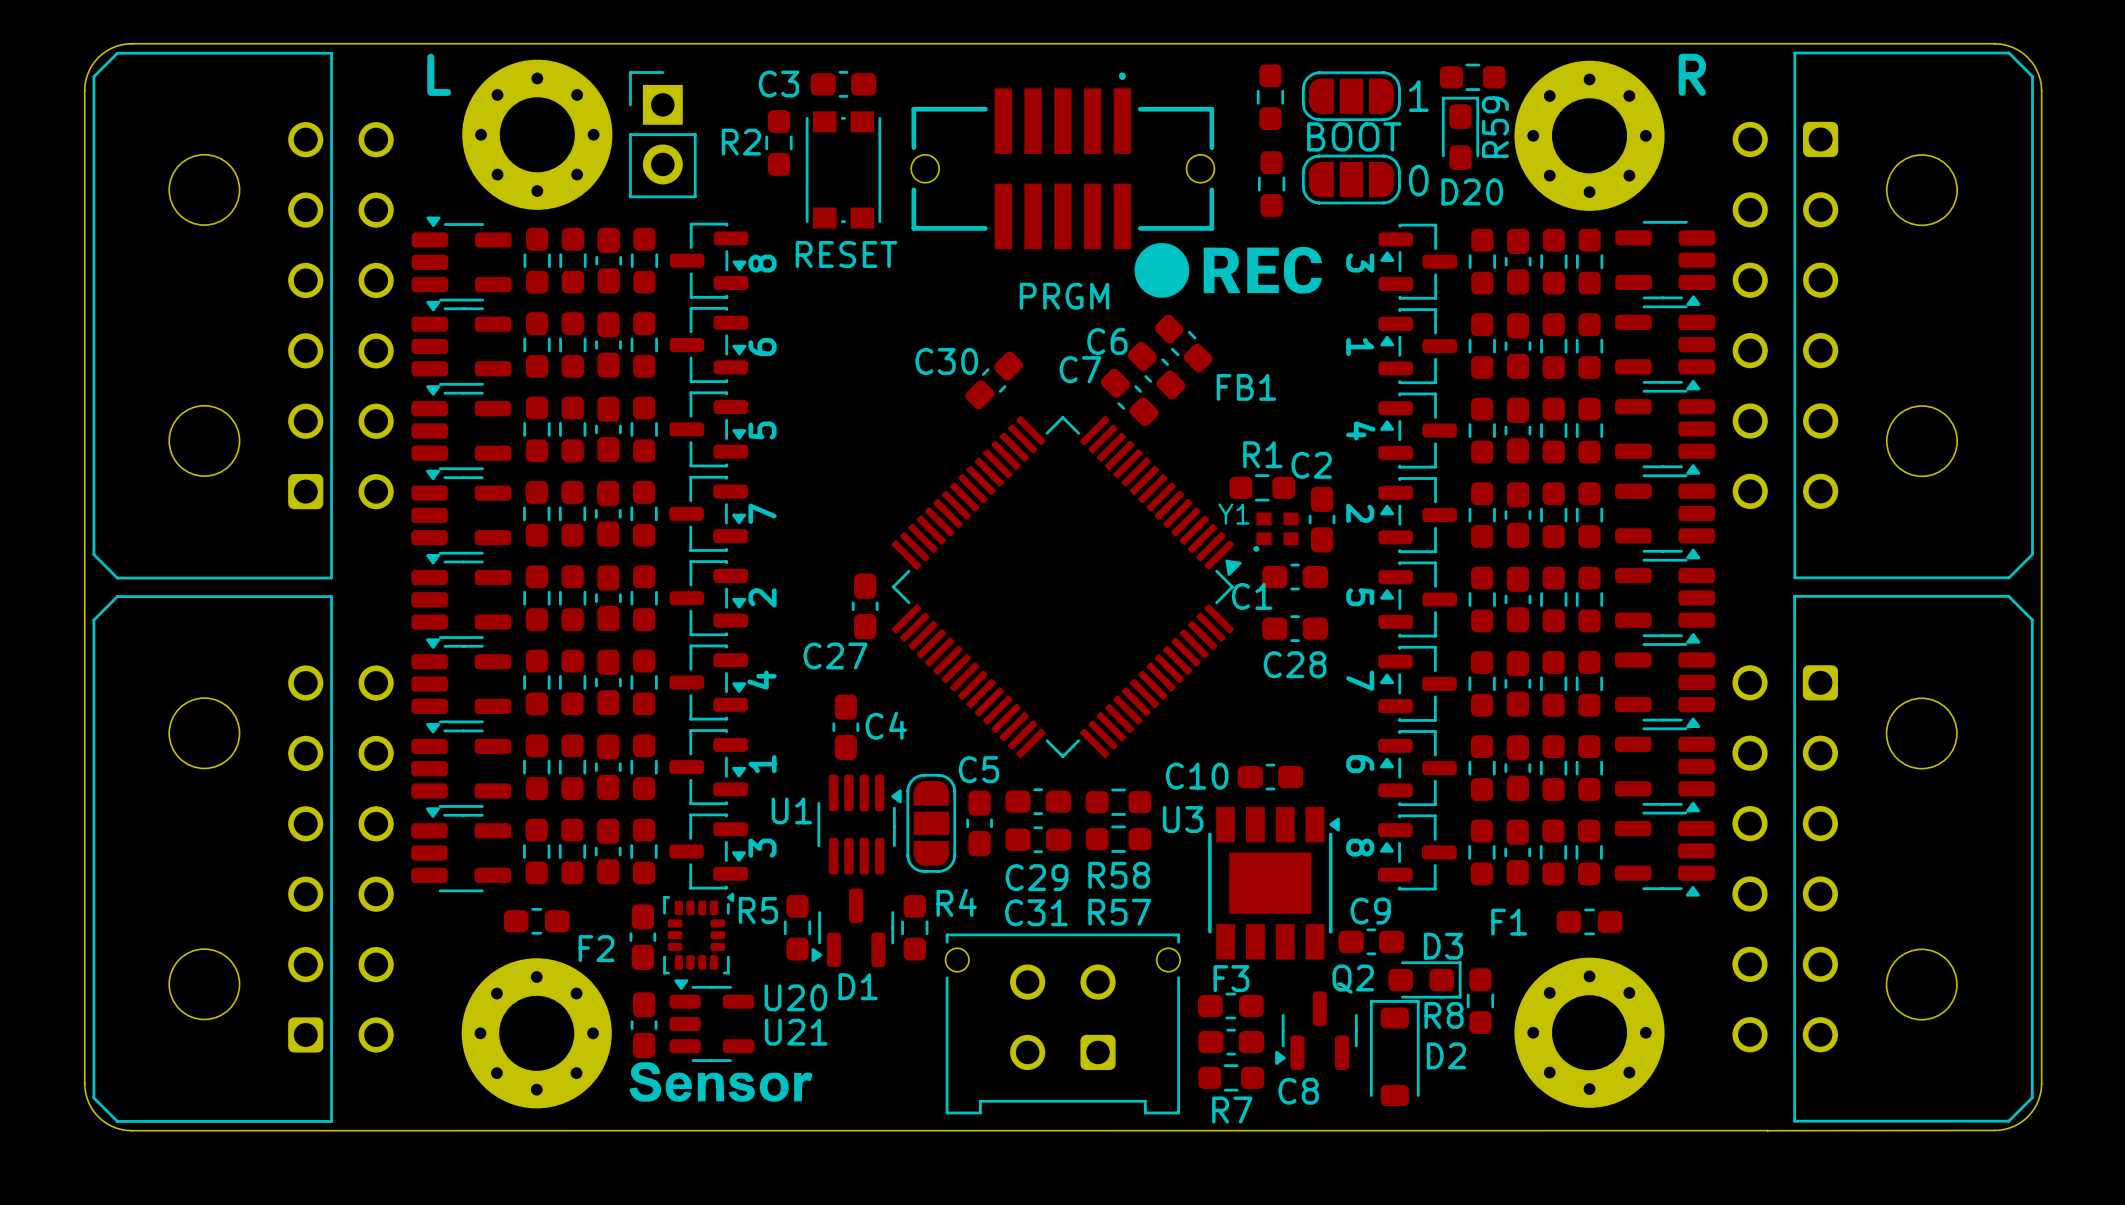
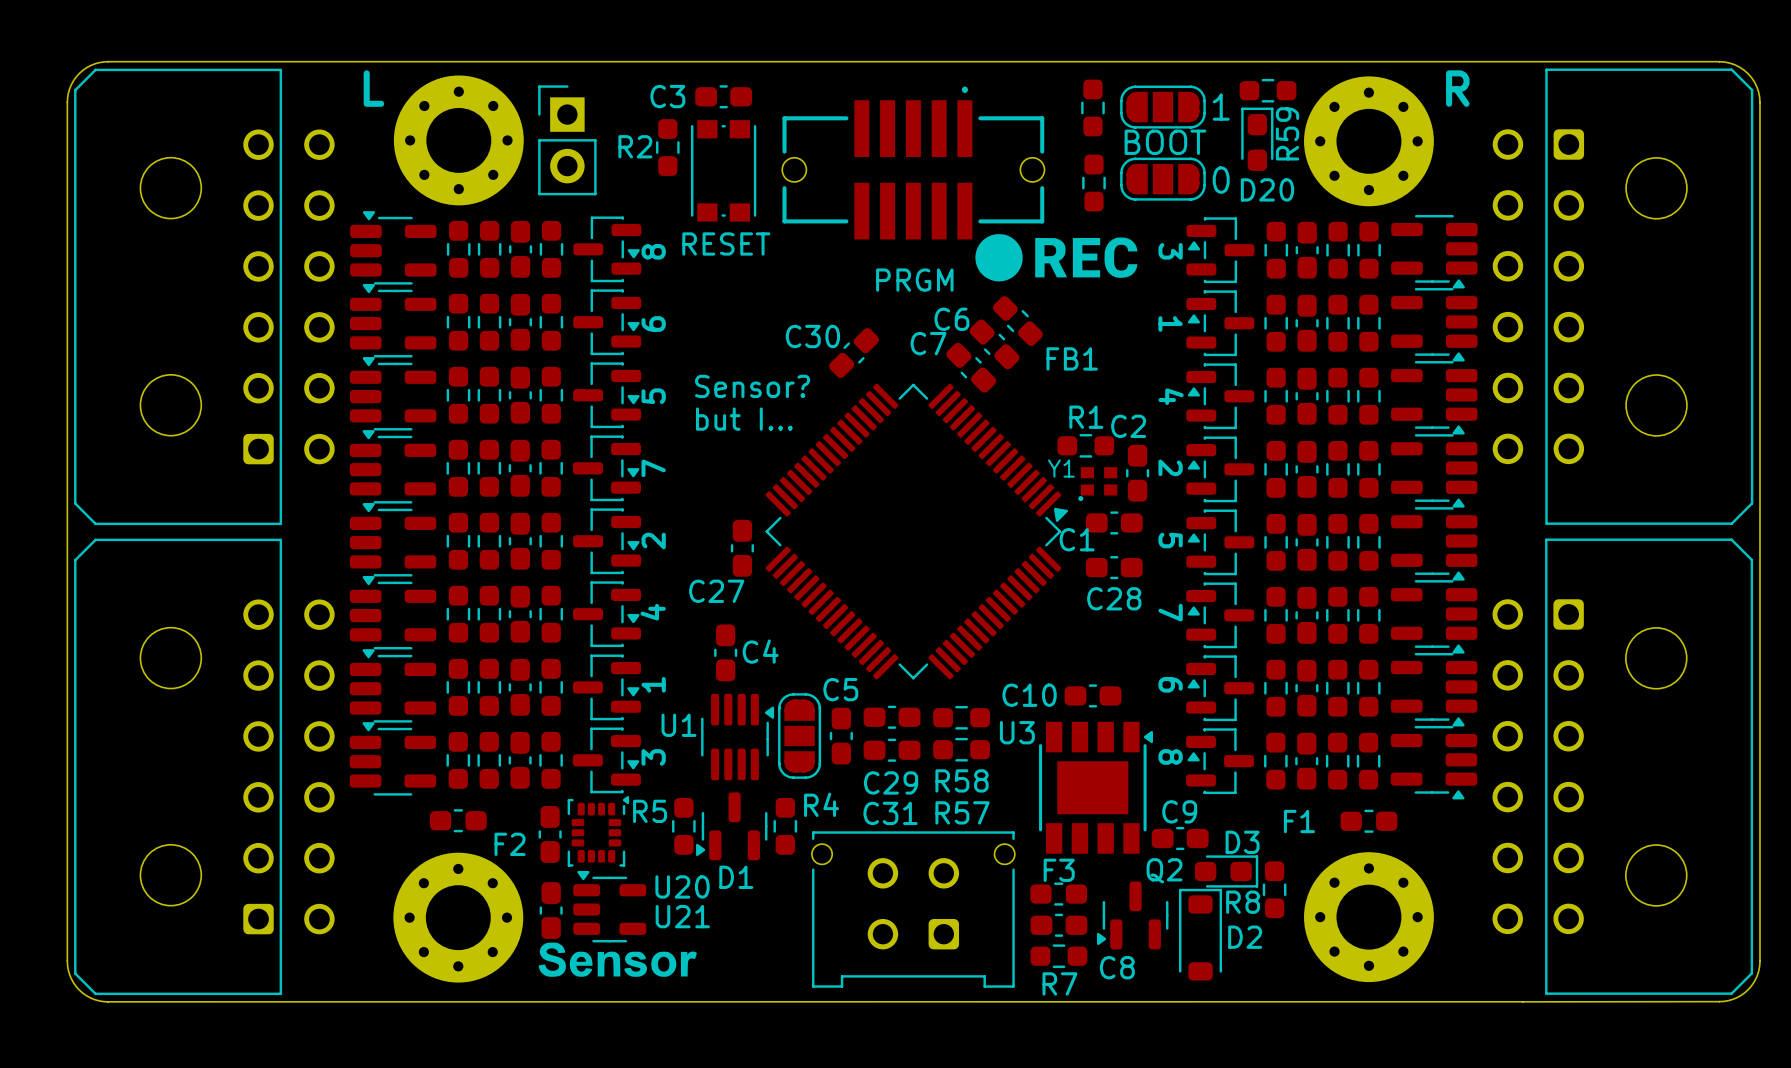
text: none -> Sensor? (752, 386)
text: none -> but I... (744, 419)

